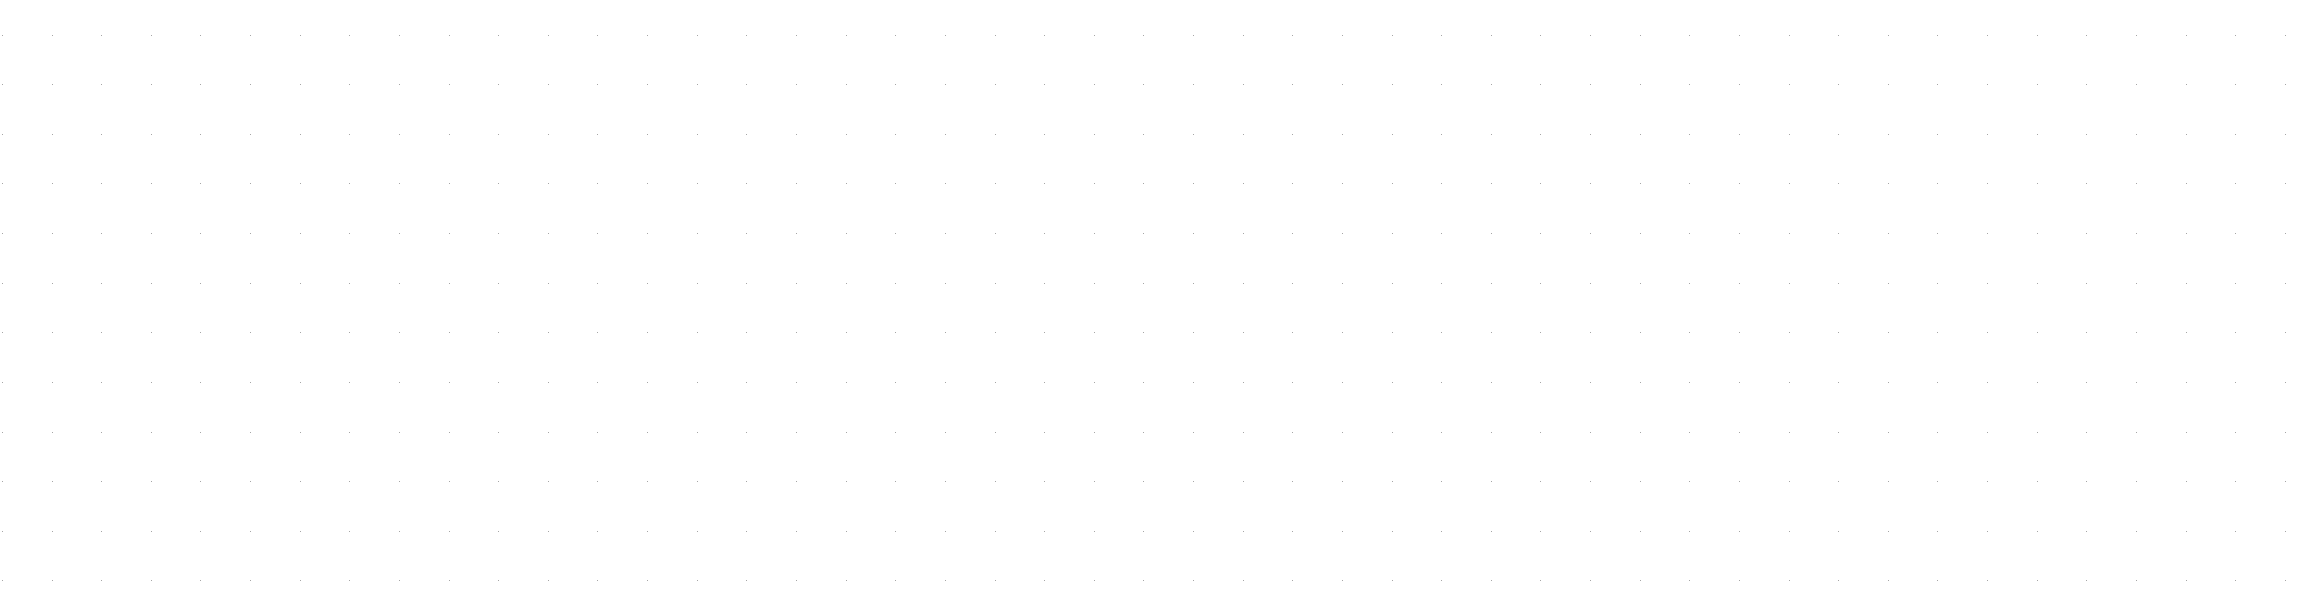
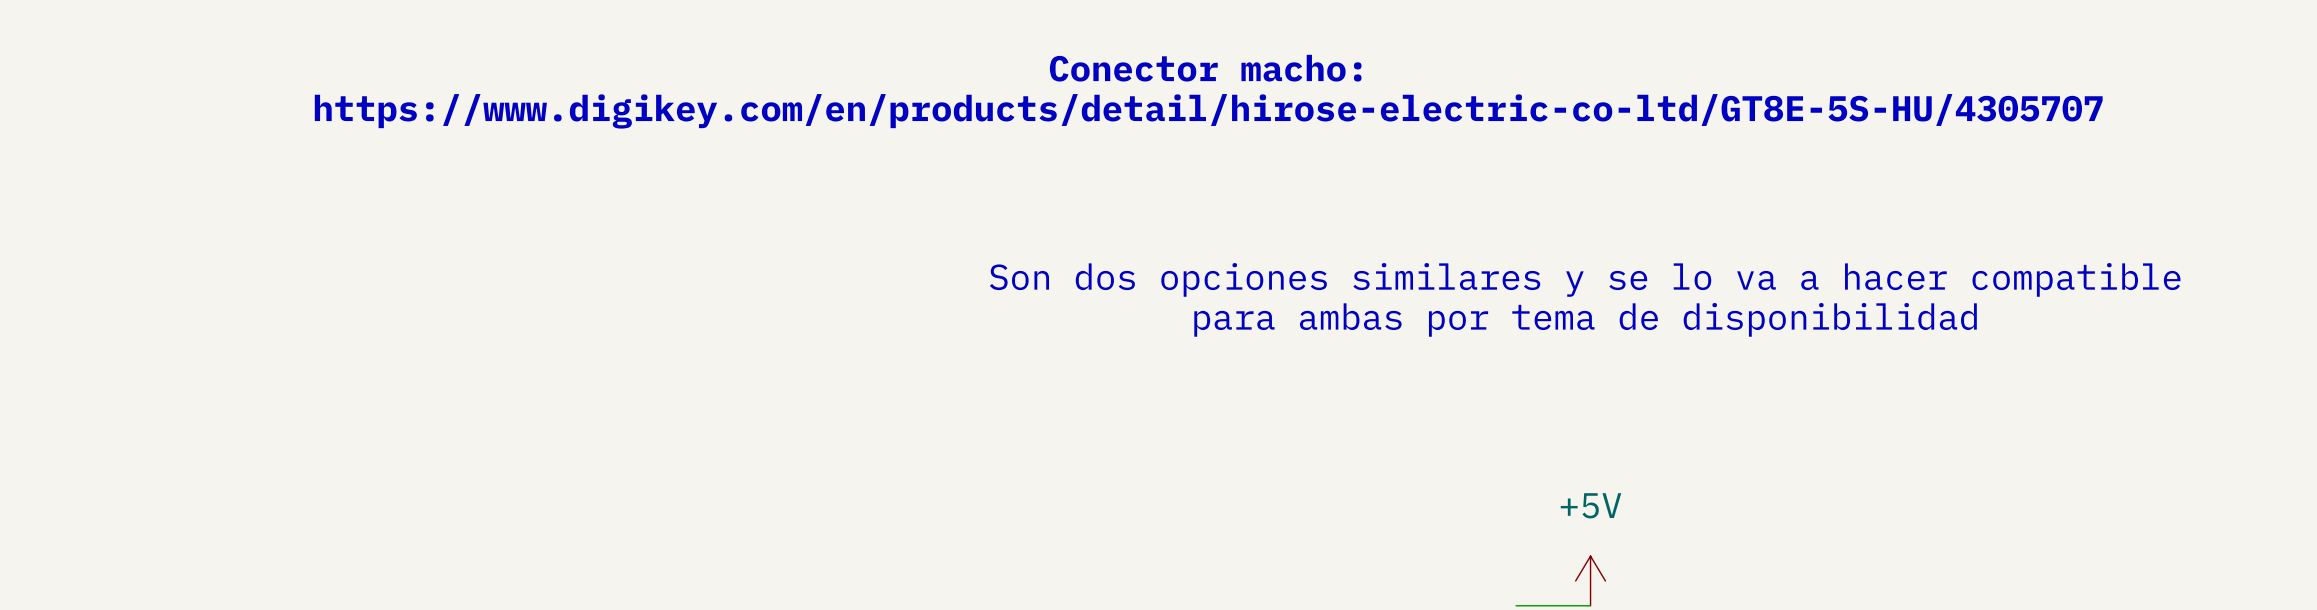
text: none -> Conector macho: (1205, 68)
text: none -> https://www.digikey.com/en/products/detail/hirose-electric-co-ltd/GT8E-5S-HU/4305707 (1208, 111)
text: none -> Son dos opciones similares y se lo va a hacer compatible (1585, 279)
text: none -> para ambas por tema de disponibilidad (1585, 319)
power symbol: none -> +5V (1590, 580)
wire: none -> (1516, 605) (1590, 605)

